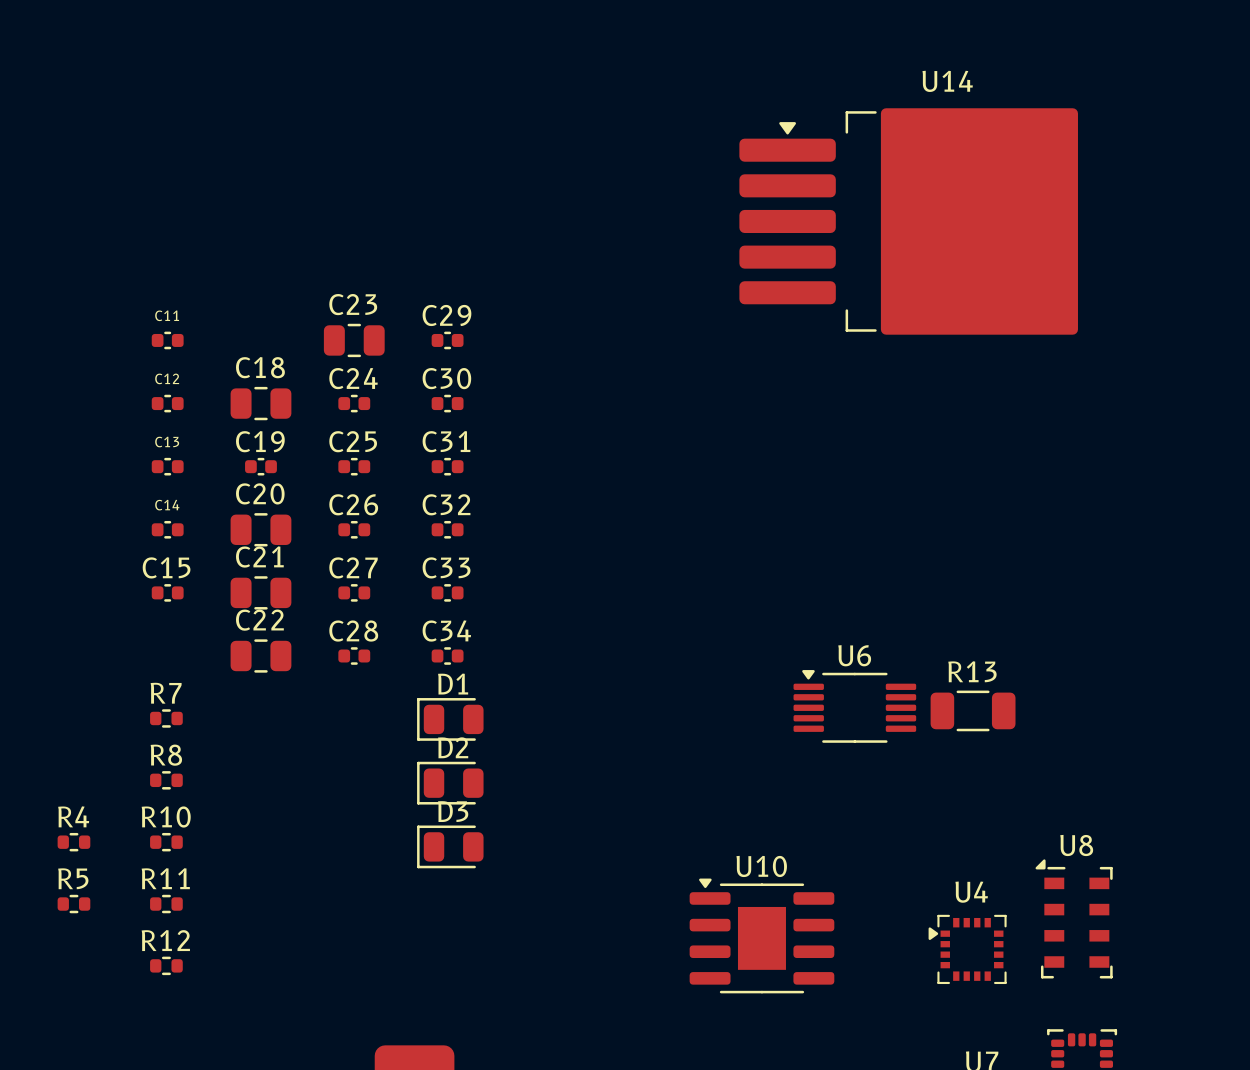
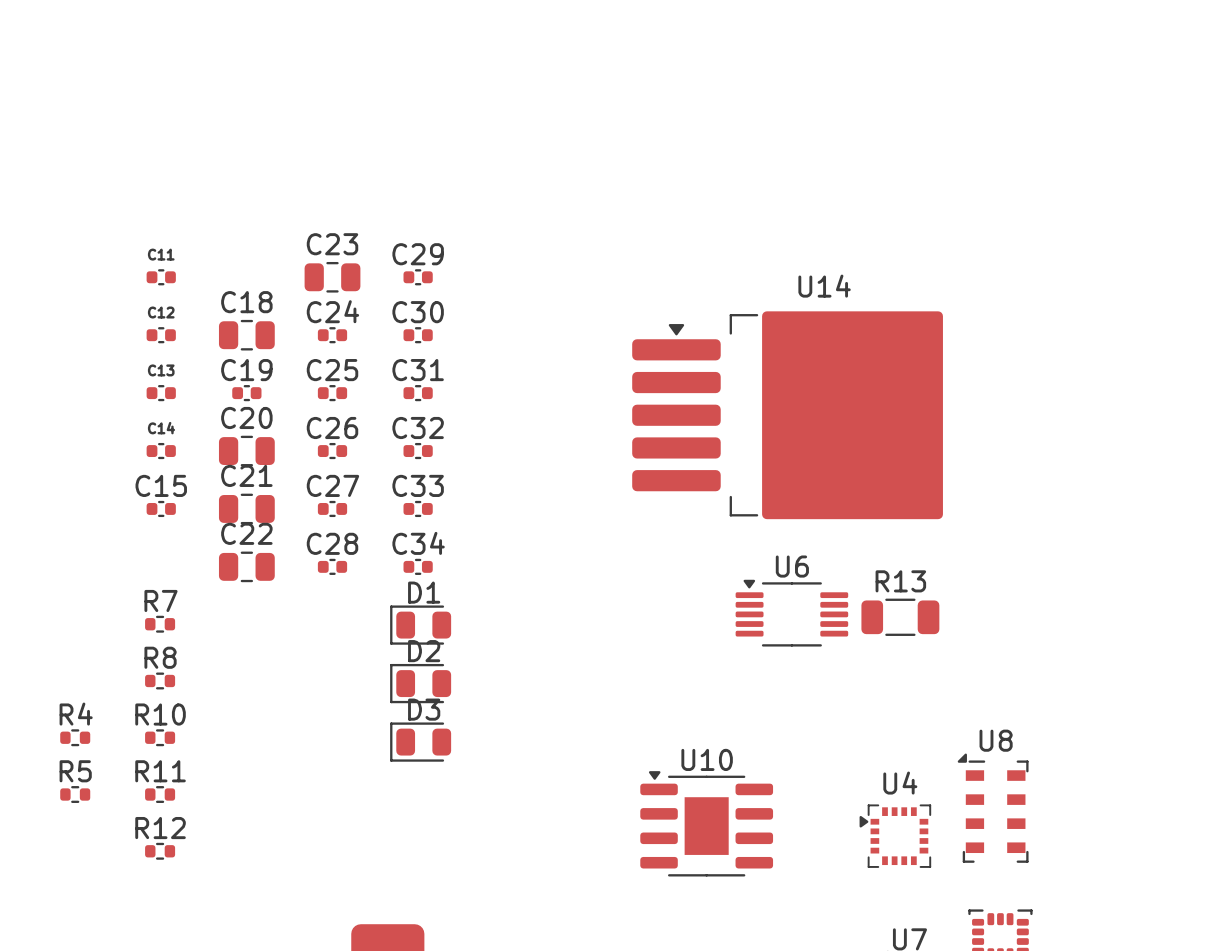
U14 position: (908, 221) -> (787, 415)

